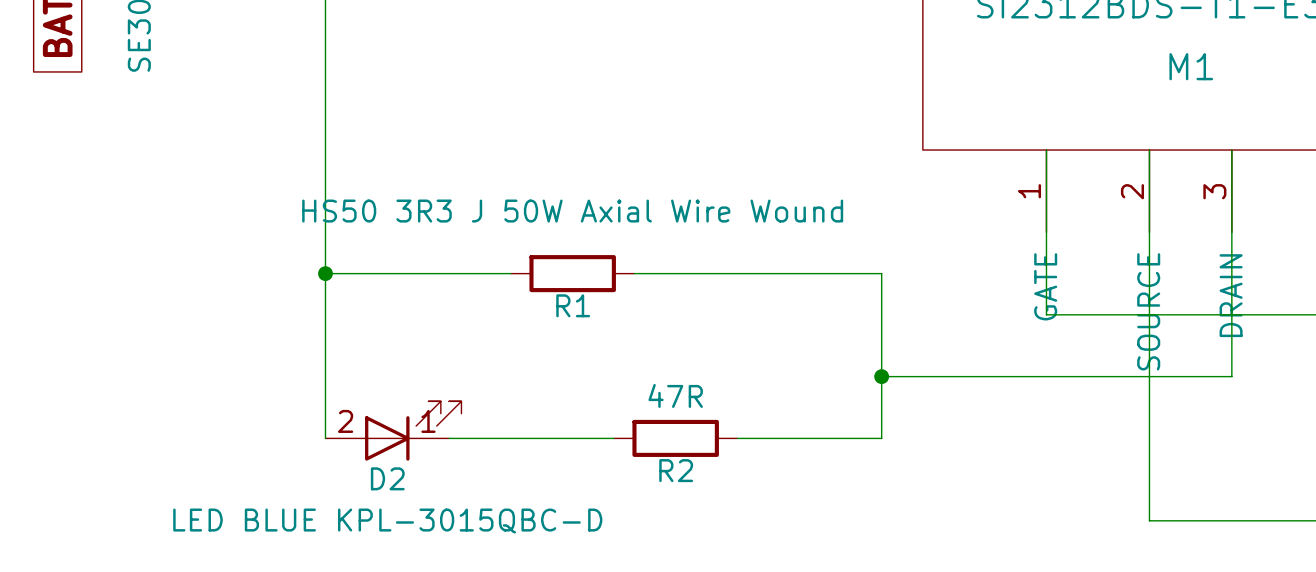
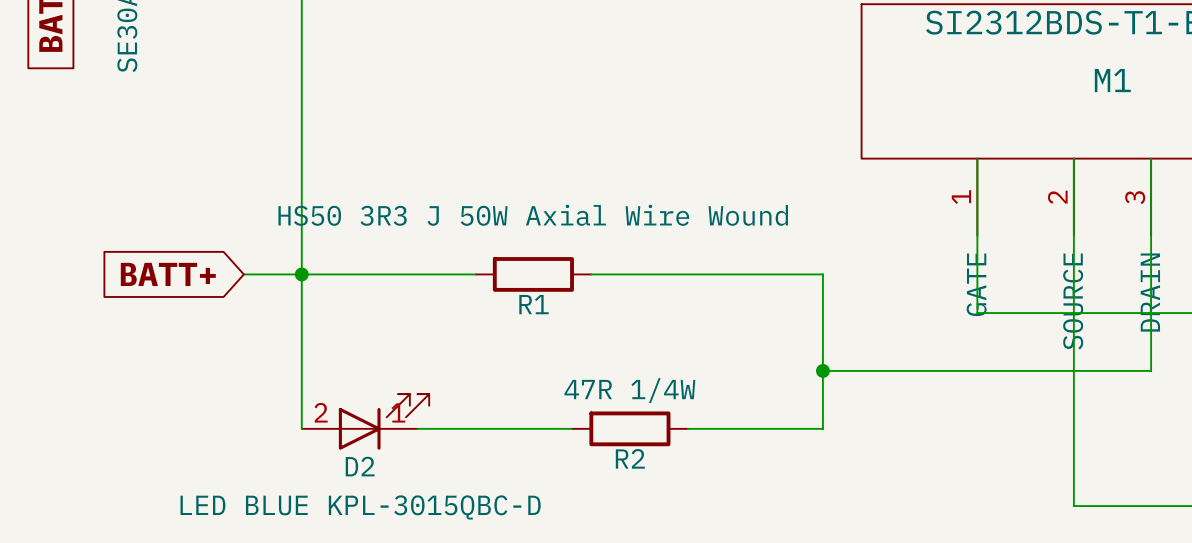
global label: none -> BATT+ (168, 274)
wire: none -> (243, 274) (301, 274)
R2 value: 47R (675, 395) -> 47R 1/4W (629, 390)

